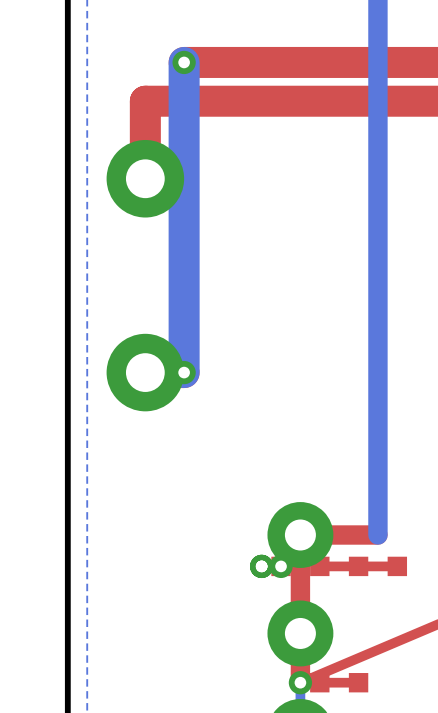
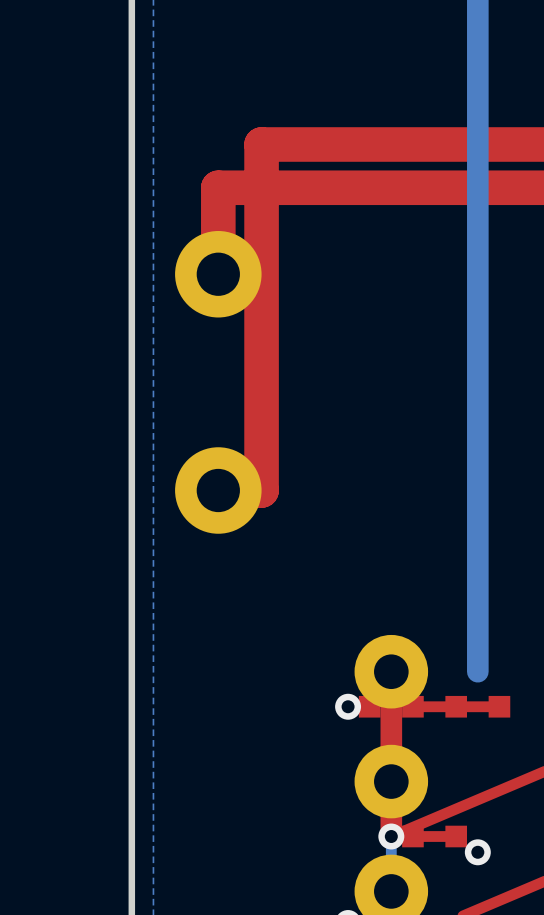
bottom track: (184, 62) (184, 372) -> none
top track: none -> (261, 144) (261, 490)
via: (184, 62) -> none
via: (184, 372) -> none
top track: (377, 535) (300, 535) -> none
via: (281, 566) -> none
via: none -> (477, 852)

